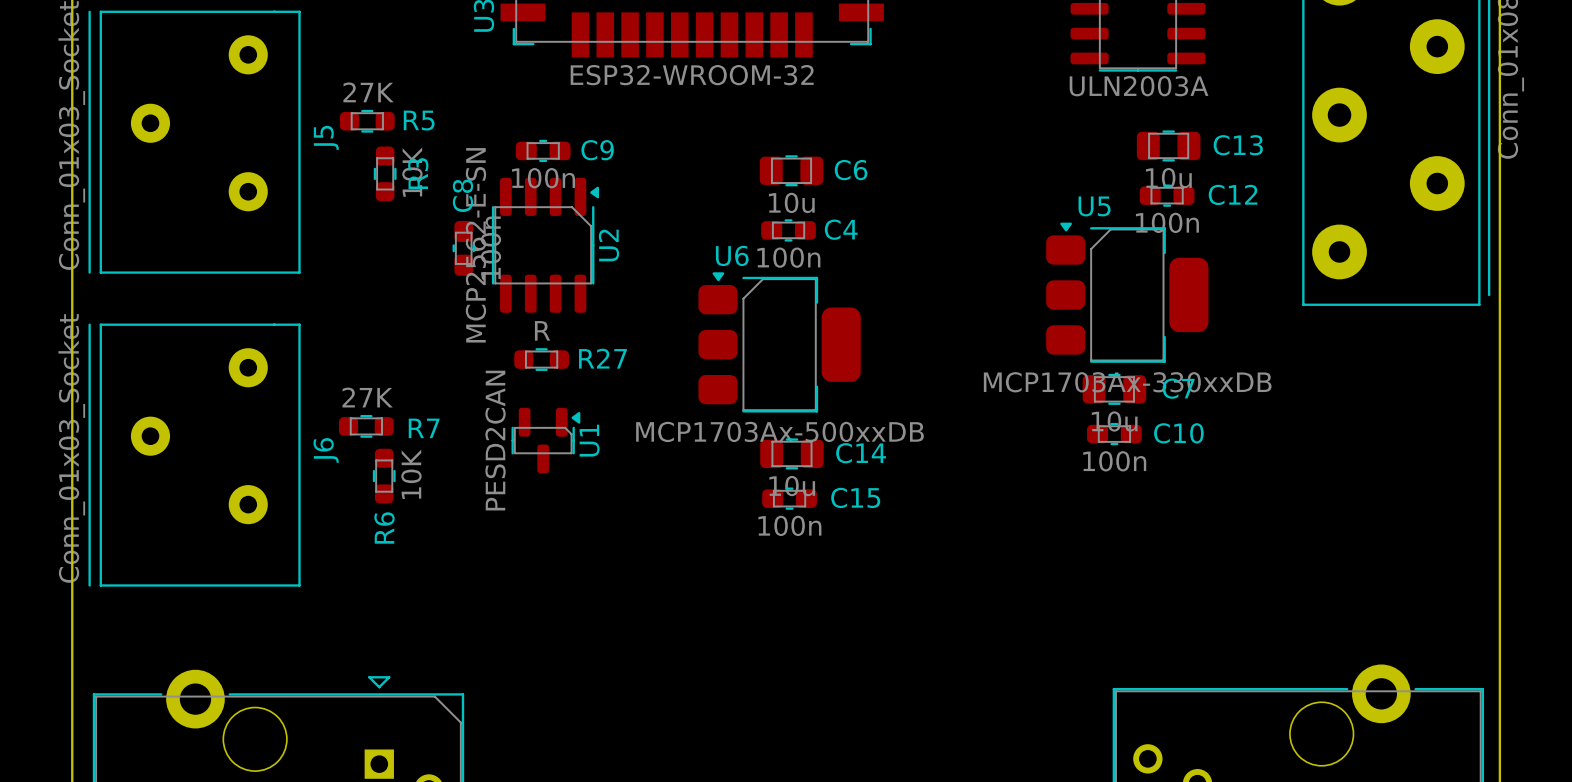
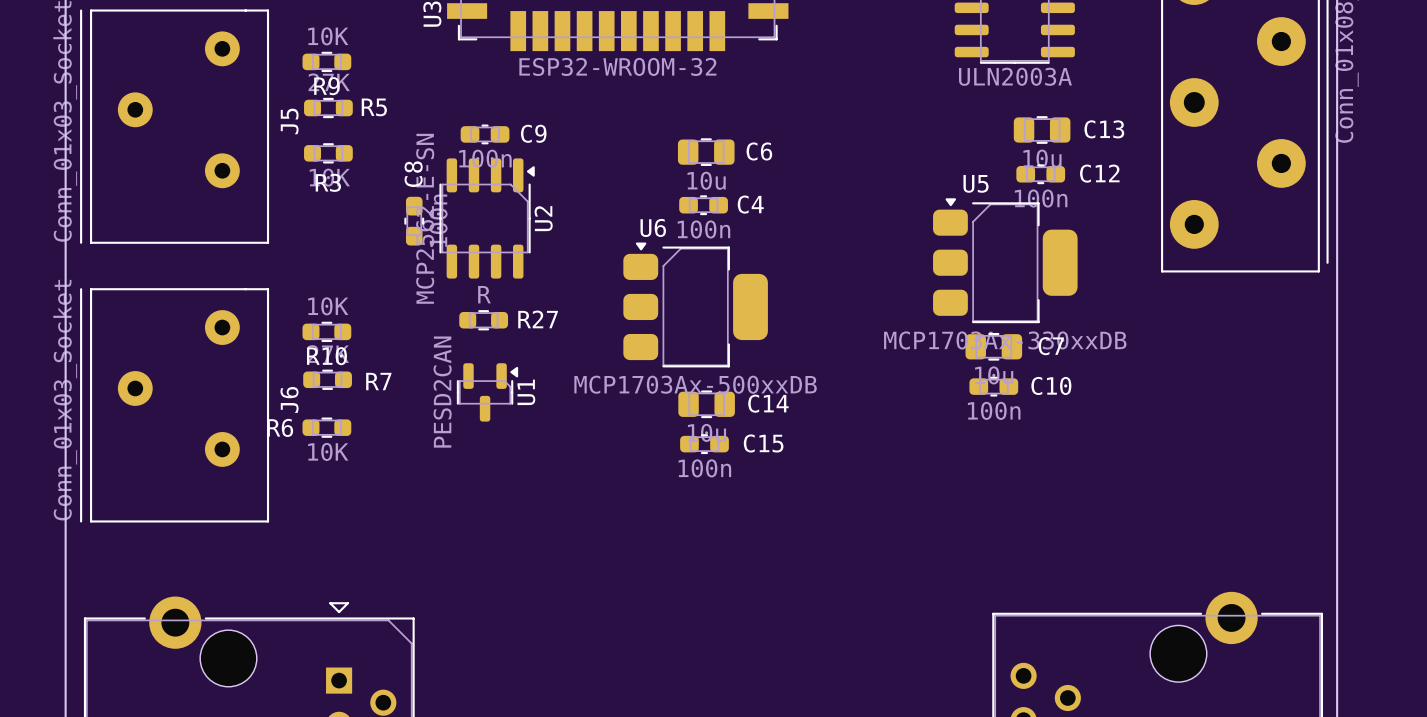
R9: none -> 10K (326, 61)
R3 rotation: 0° (385, 173) -> 90° clockwise (328, 153)
R10: none -> 10K (326, 331)
R6 rotation: 0° (384, 476) -> 90° clockwise (326, 427)

